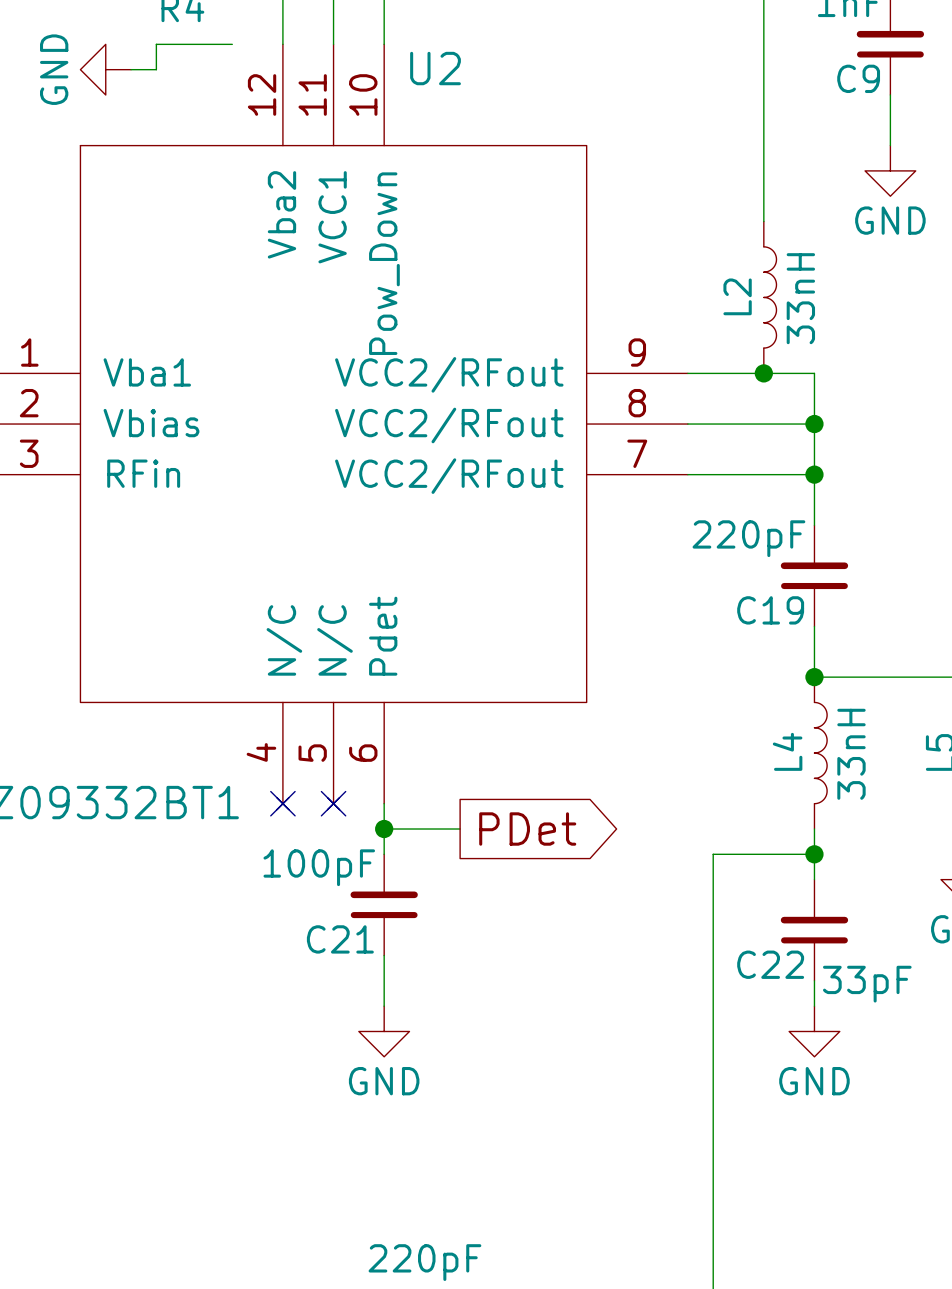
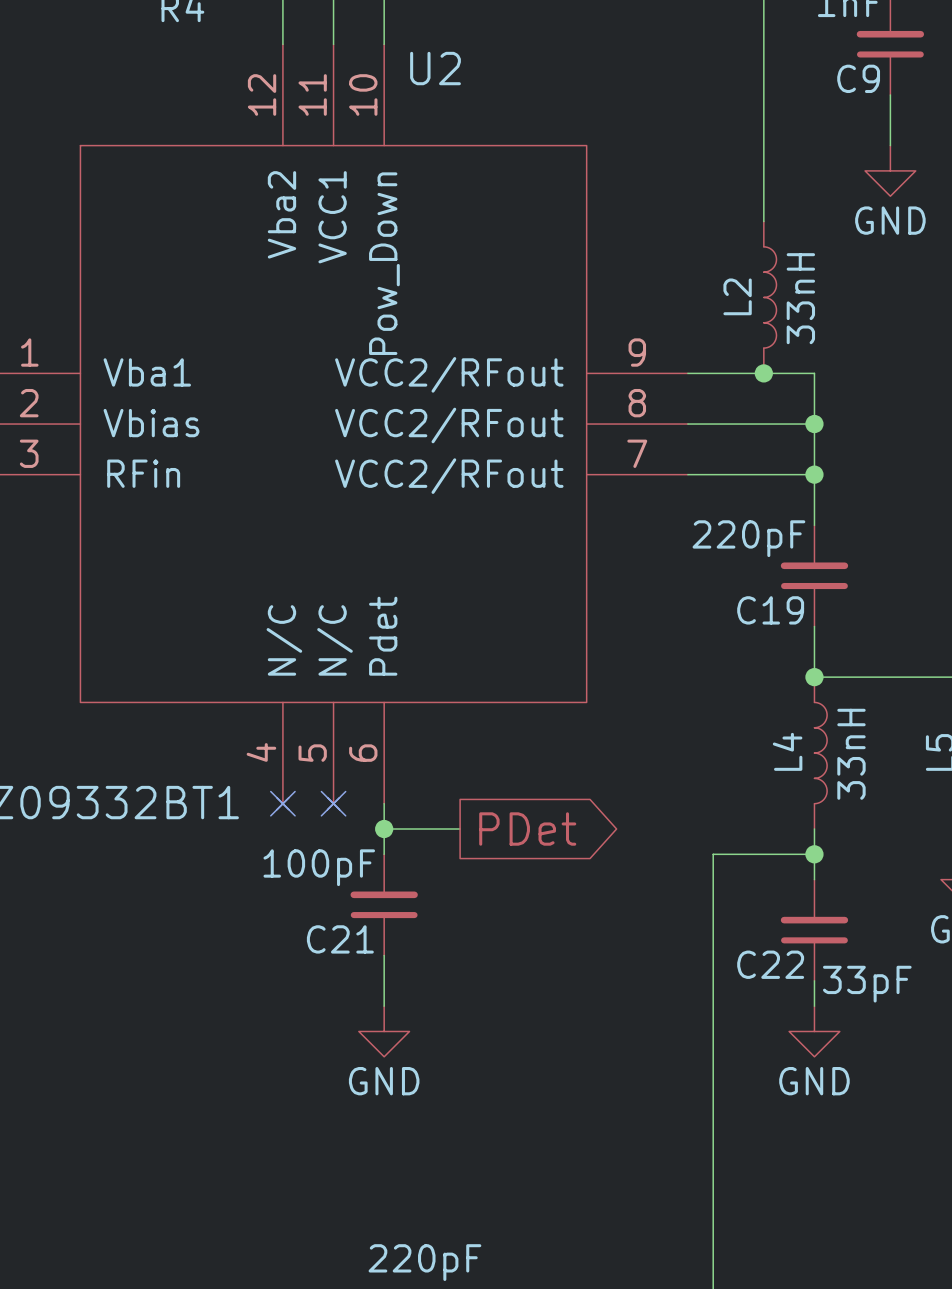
wire: (232, 44) (156, 44) (156, 69) (131, 69) -> none
power symbol: GND (105, 69) -> none

